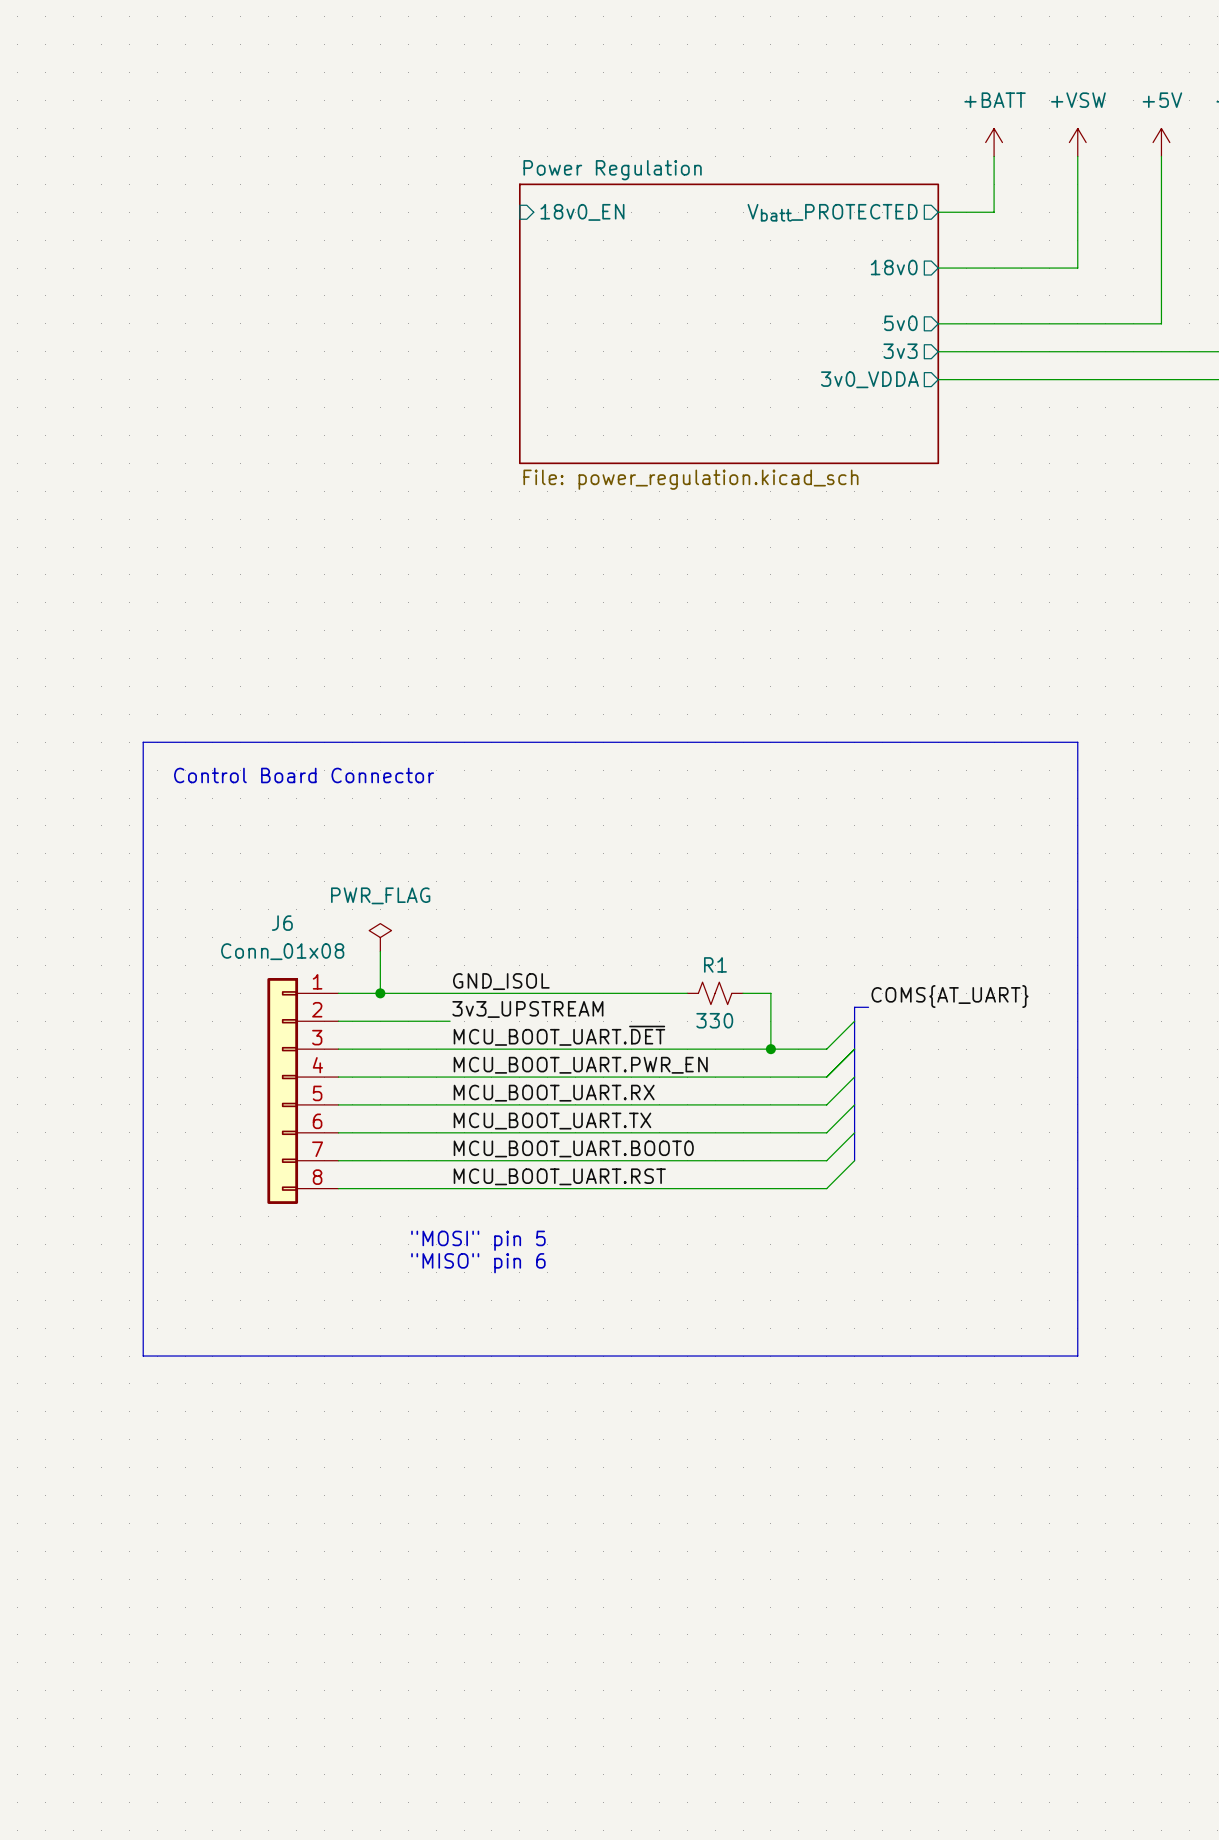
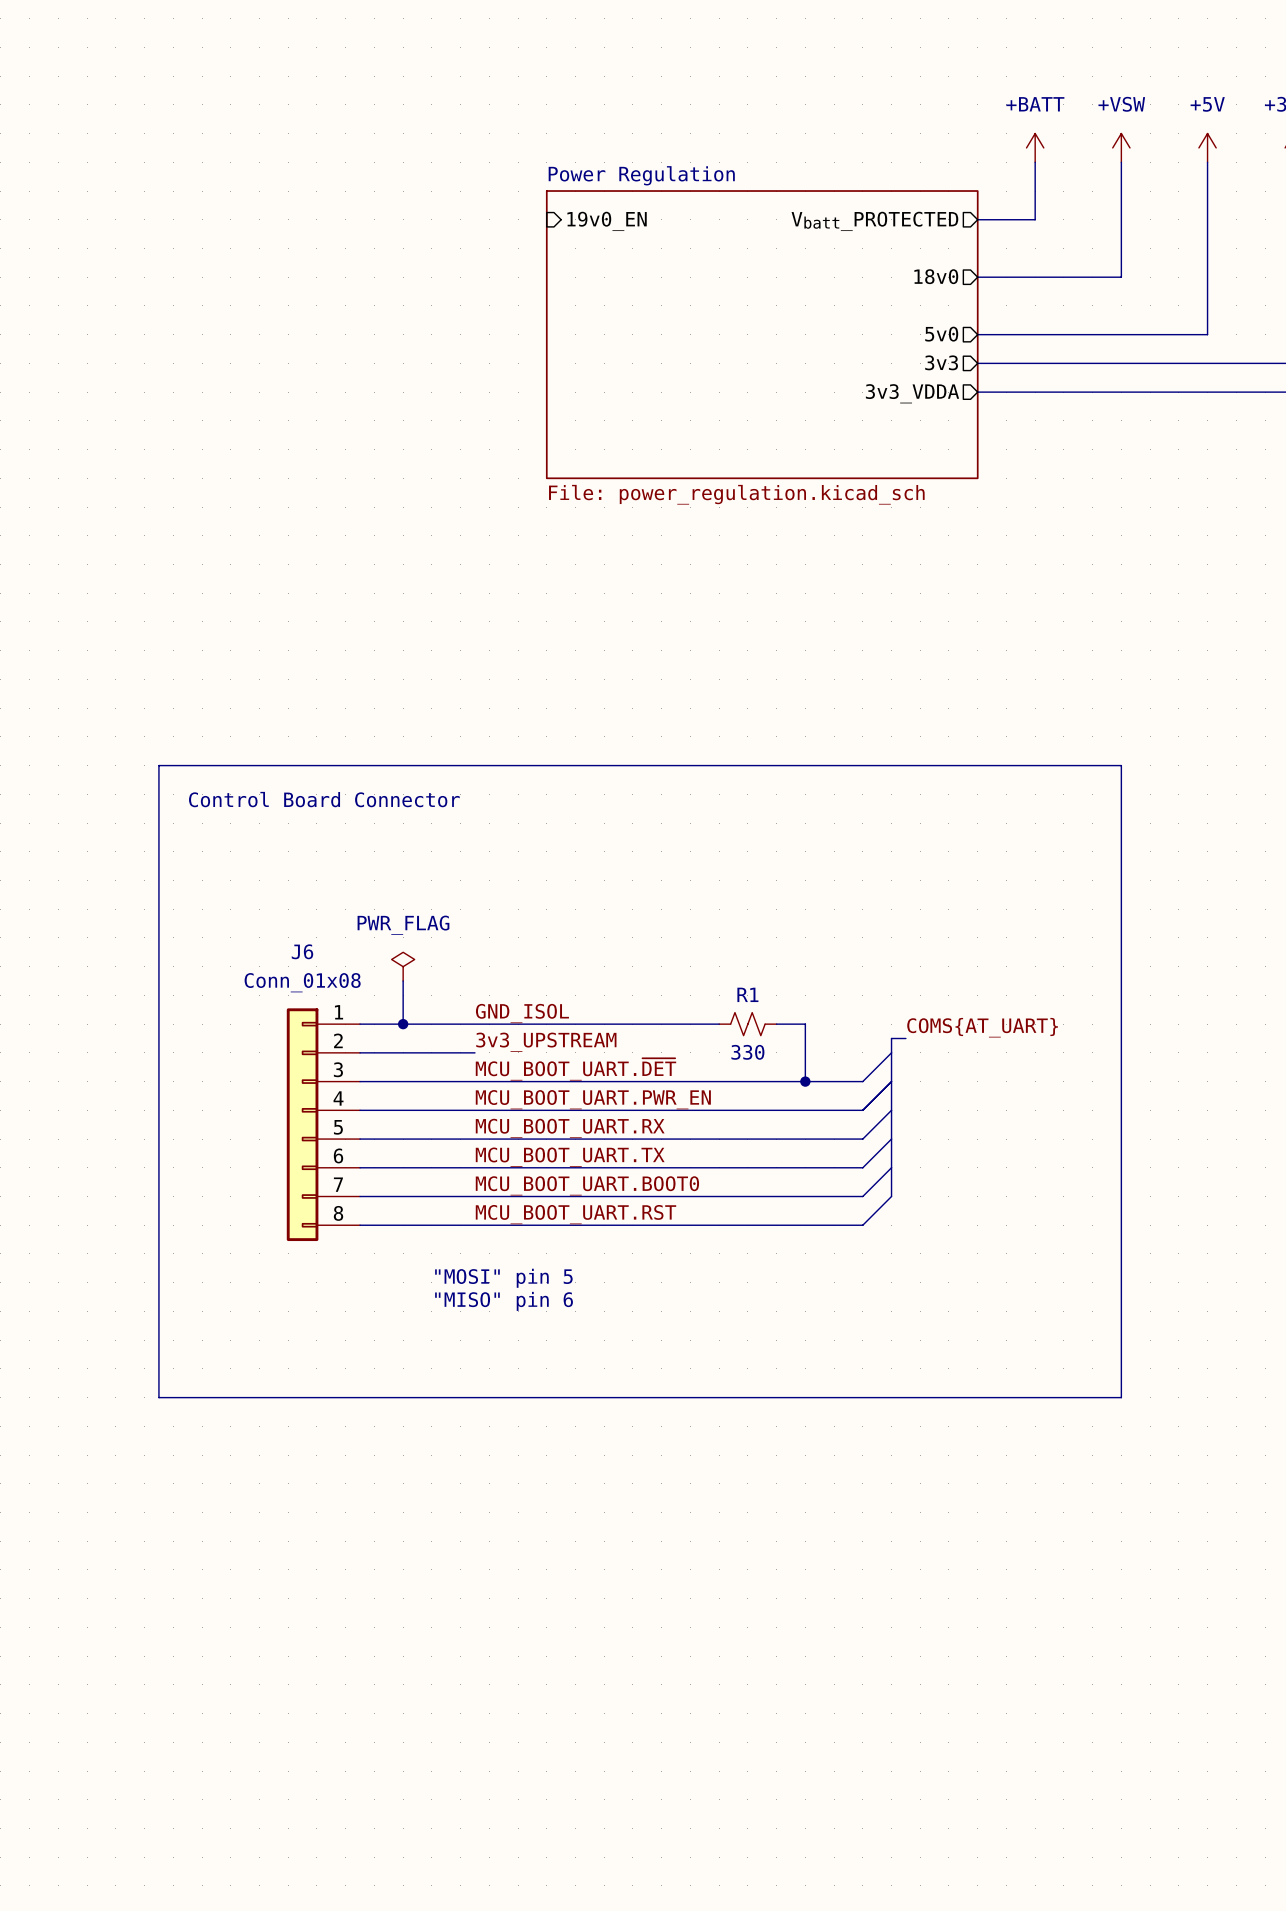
sheet pin: 18v0_EN (582, 212) -> 19v0_EN (607, 221)
sheet pin: 3v0_VDDA (869, 379) -> 3v3_VDDA (912, 393)

